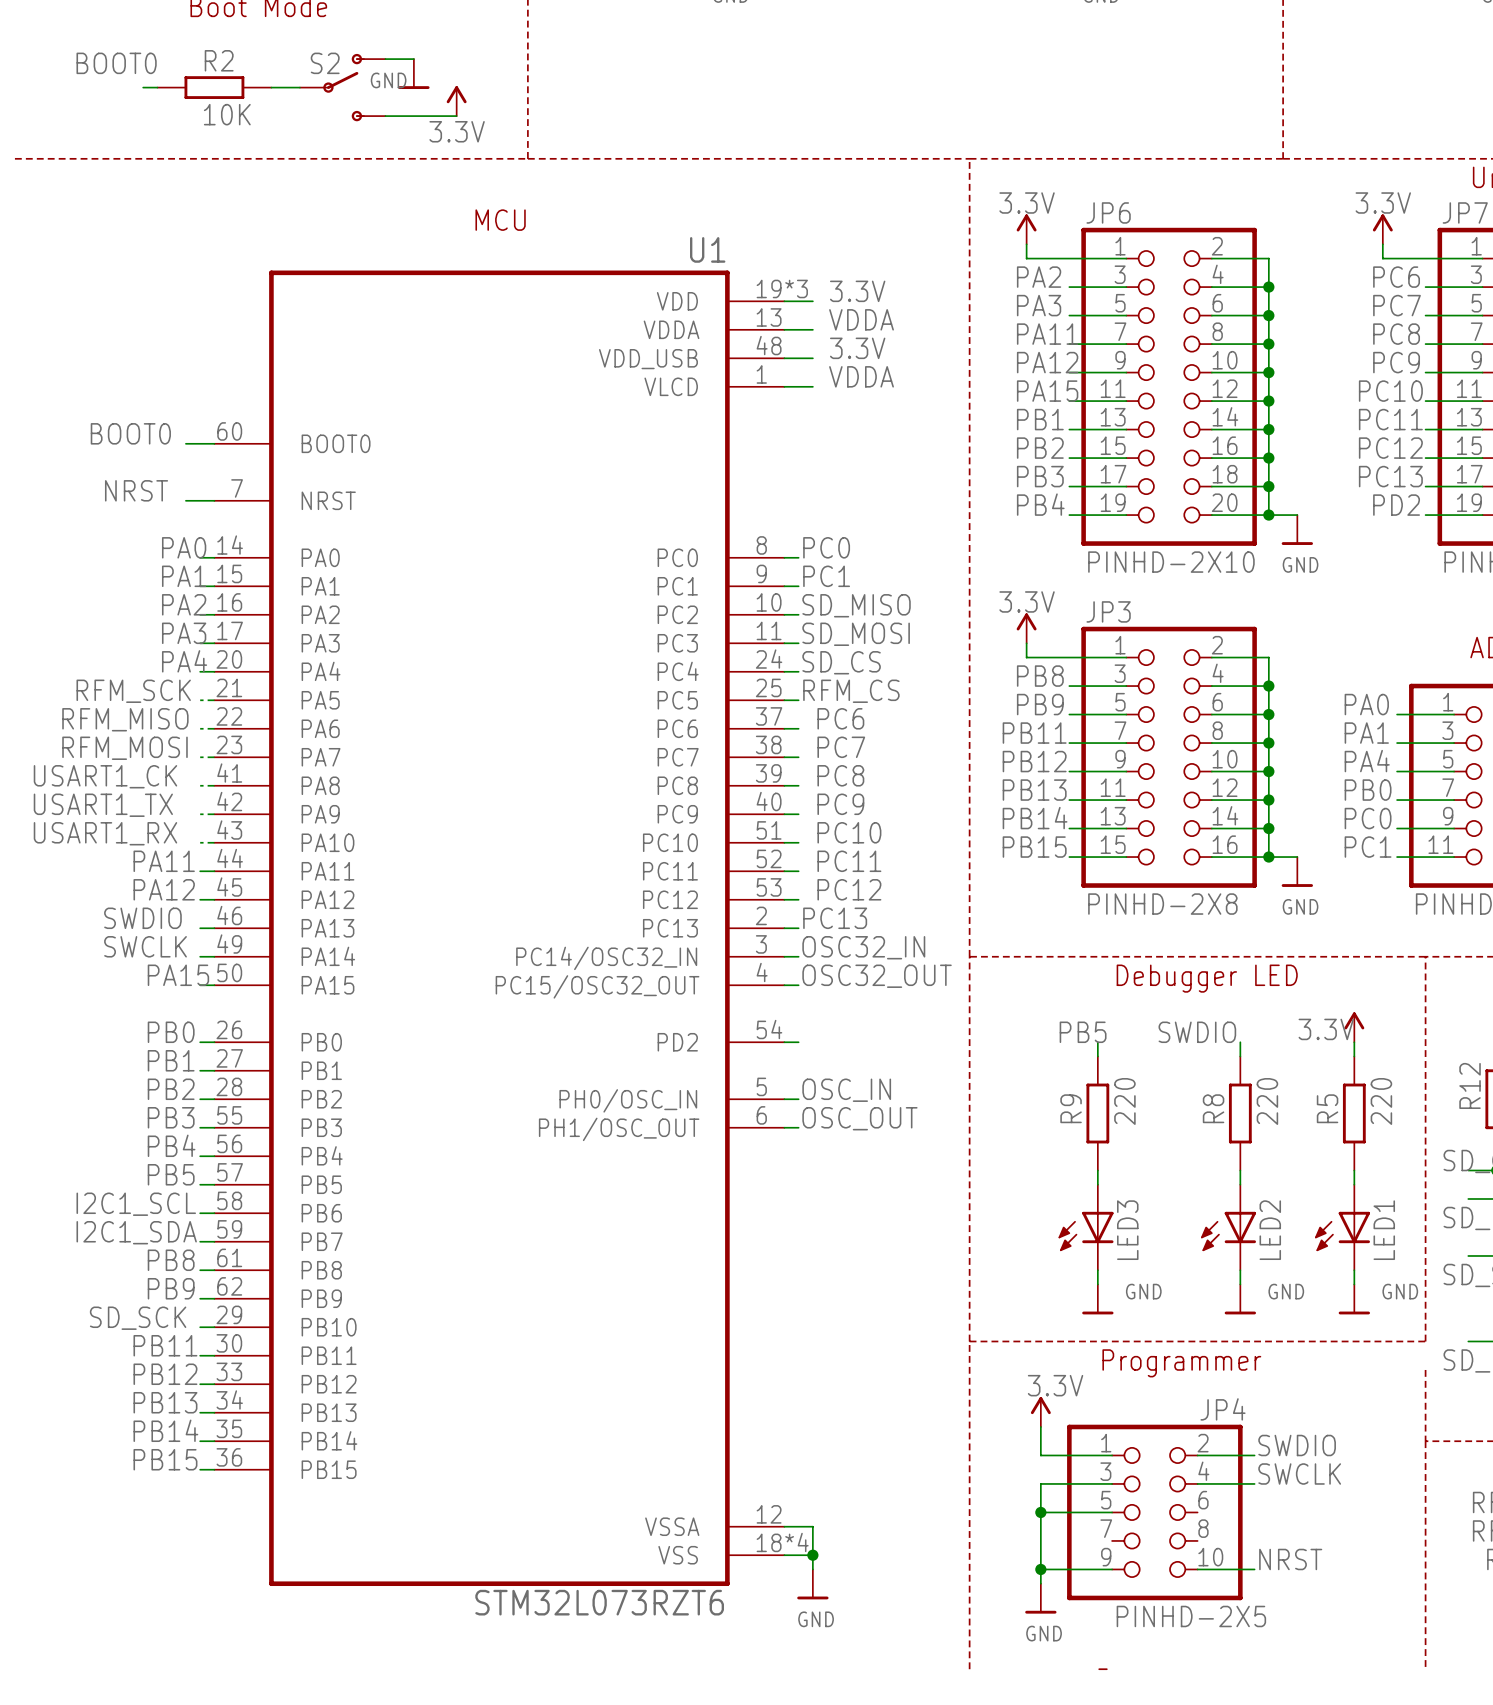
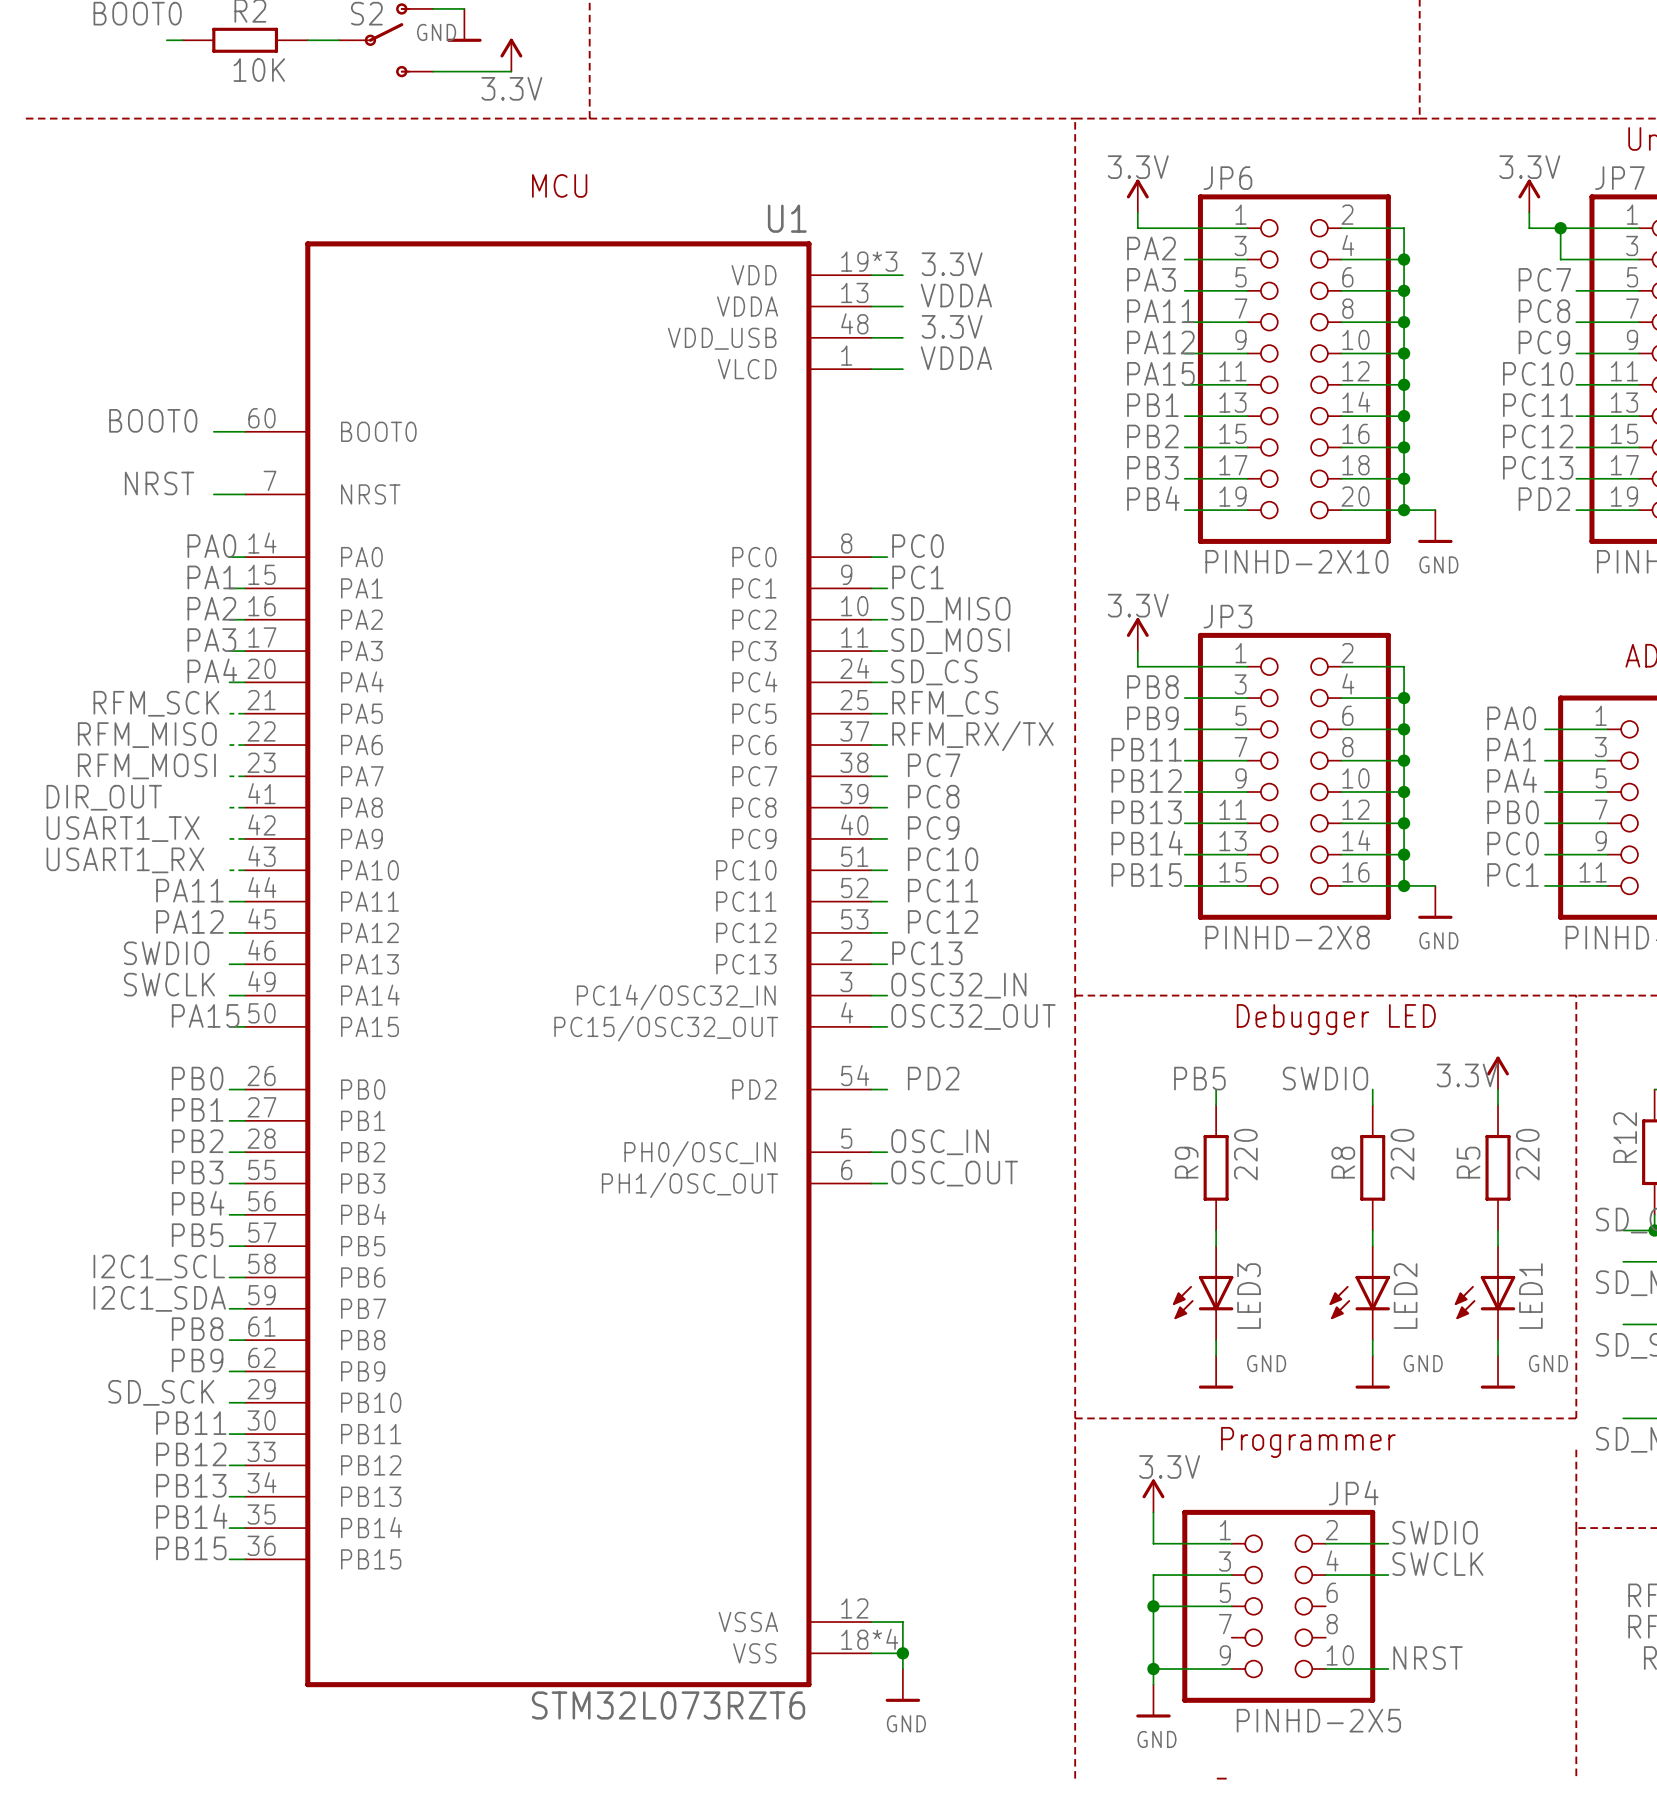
wire: none -> (1560, 228) (1560, 259) (1576, 259)
junction: none -> (1560, 228)
label: PC6 (1396, 277) -> none
label: PC6 (840, 718) -> none
label: none -> RFM_RX/TX (972, 736)
label: USART1_CK (105, 776) -> DIR_OUT (104, 797)
label: none -> PD2 (933, 1078)

